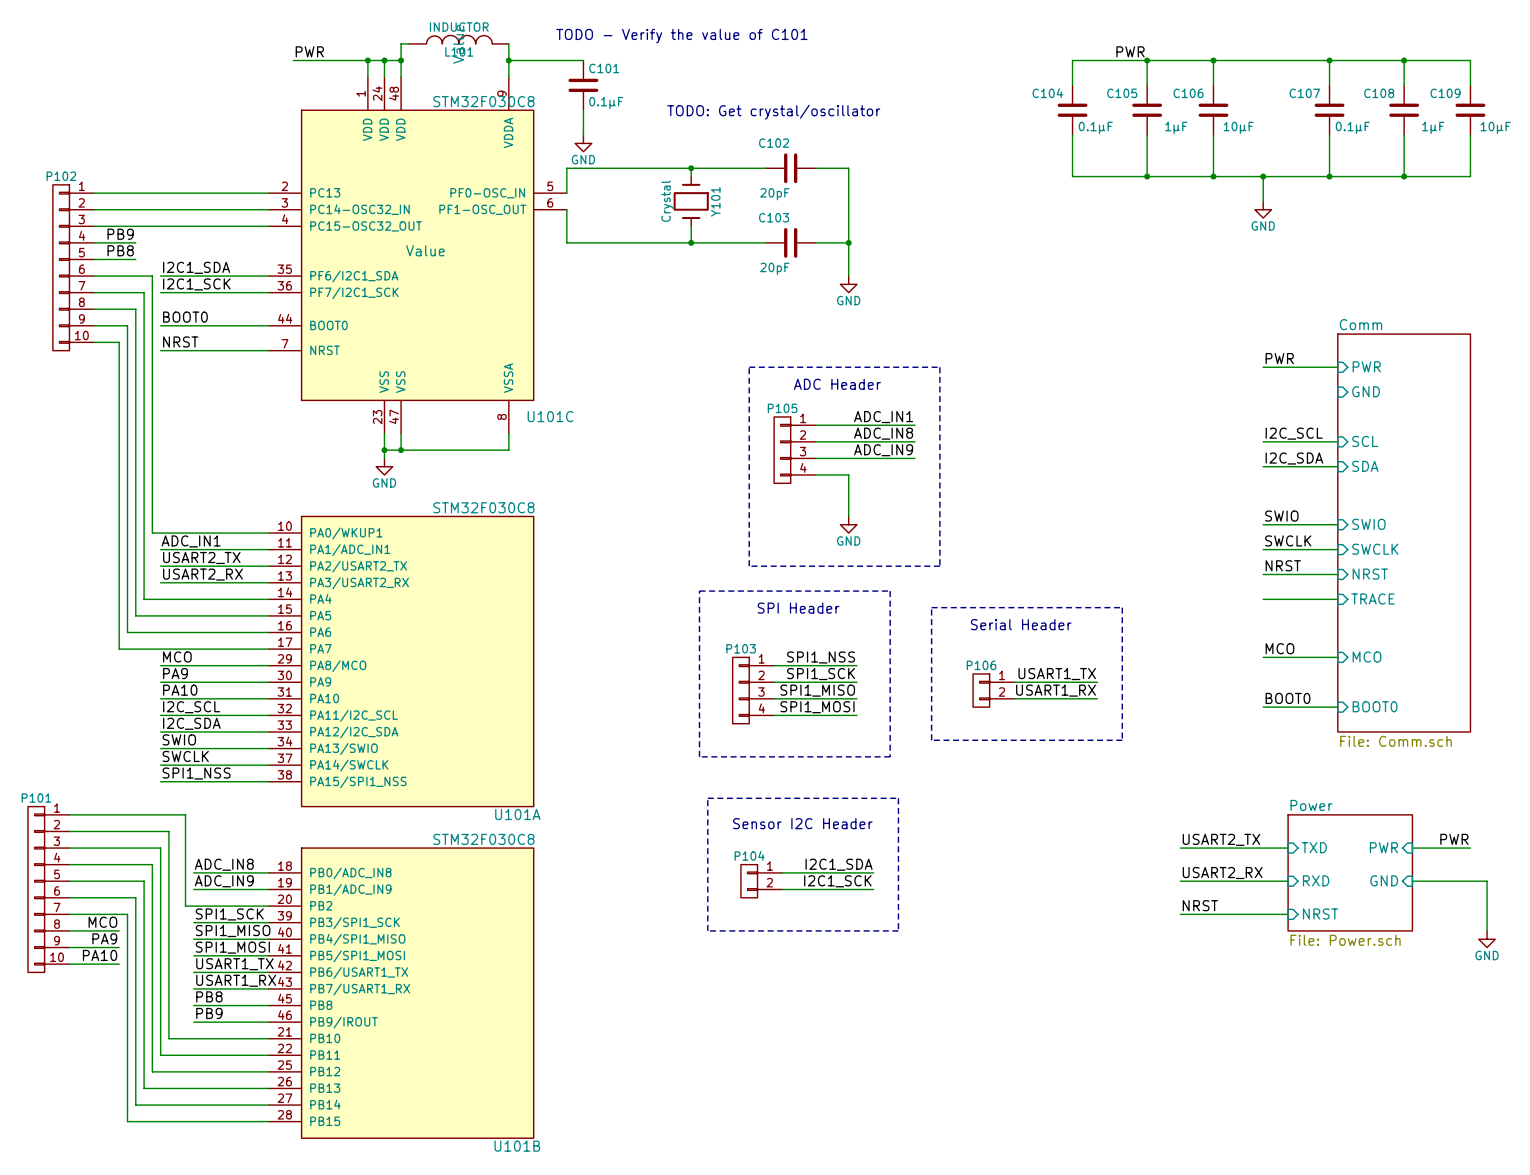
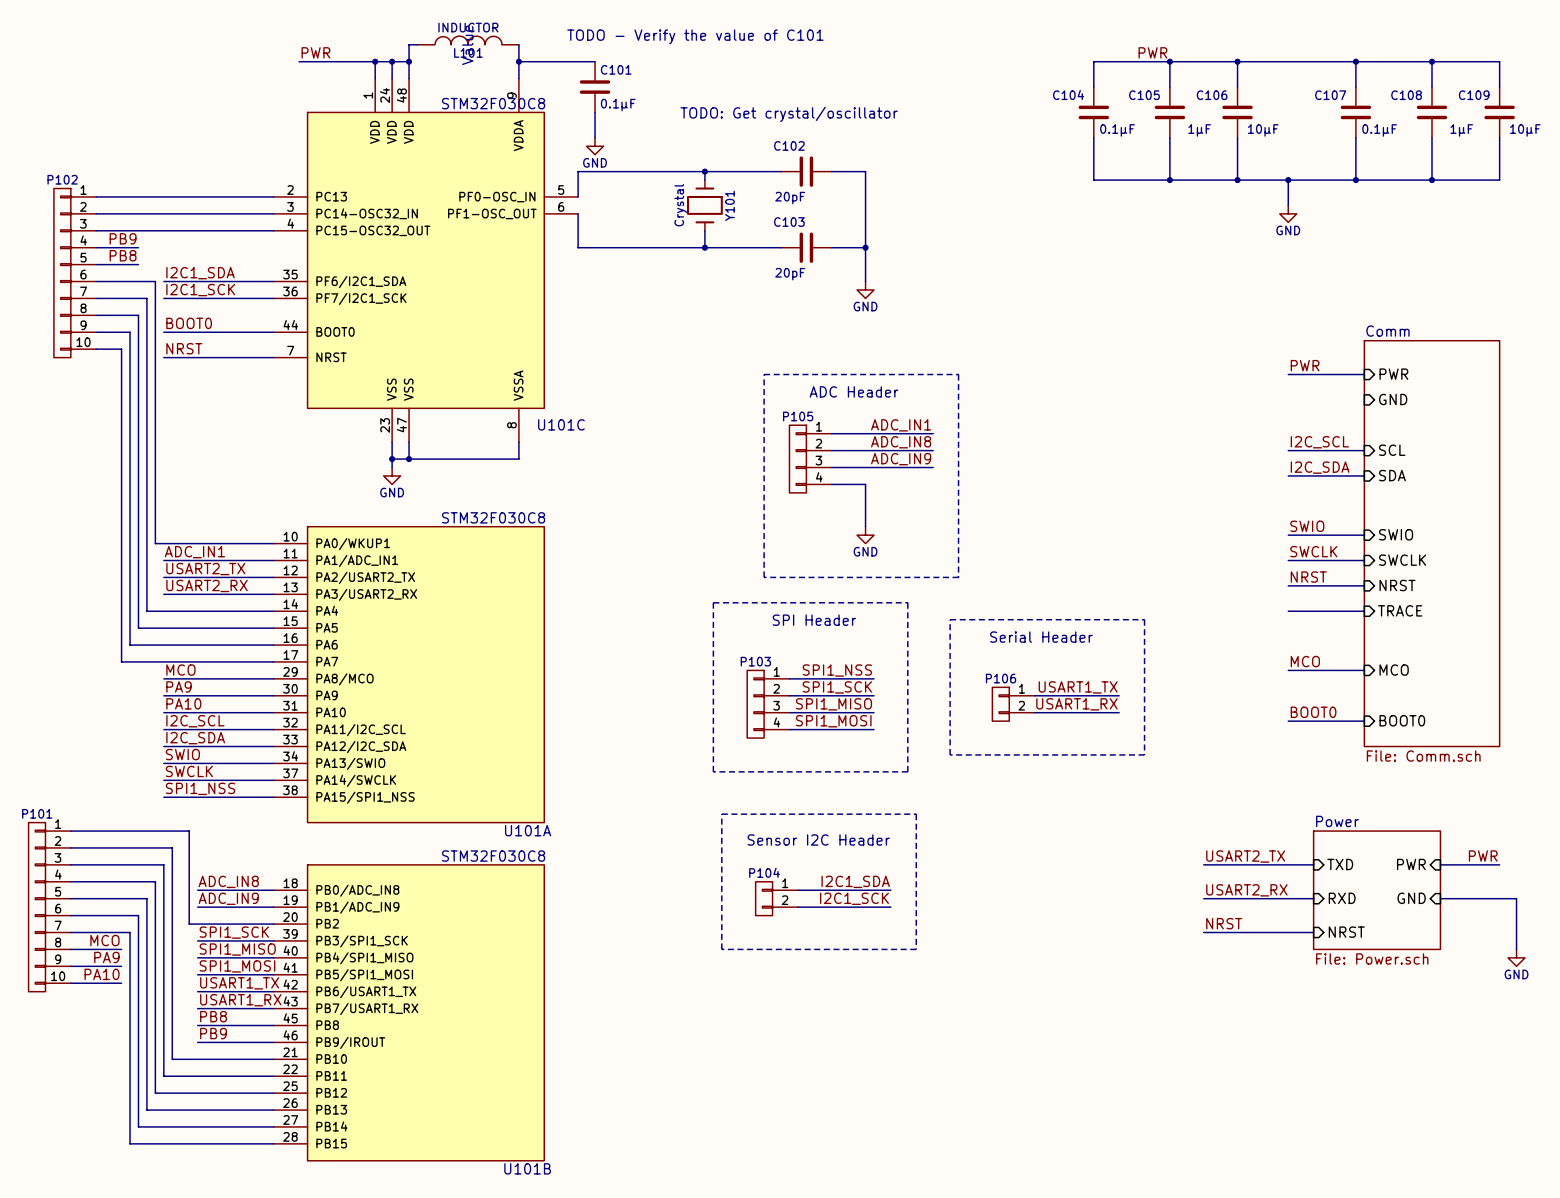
U101C text: Value (425, 250) -> none

